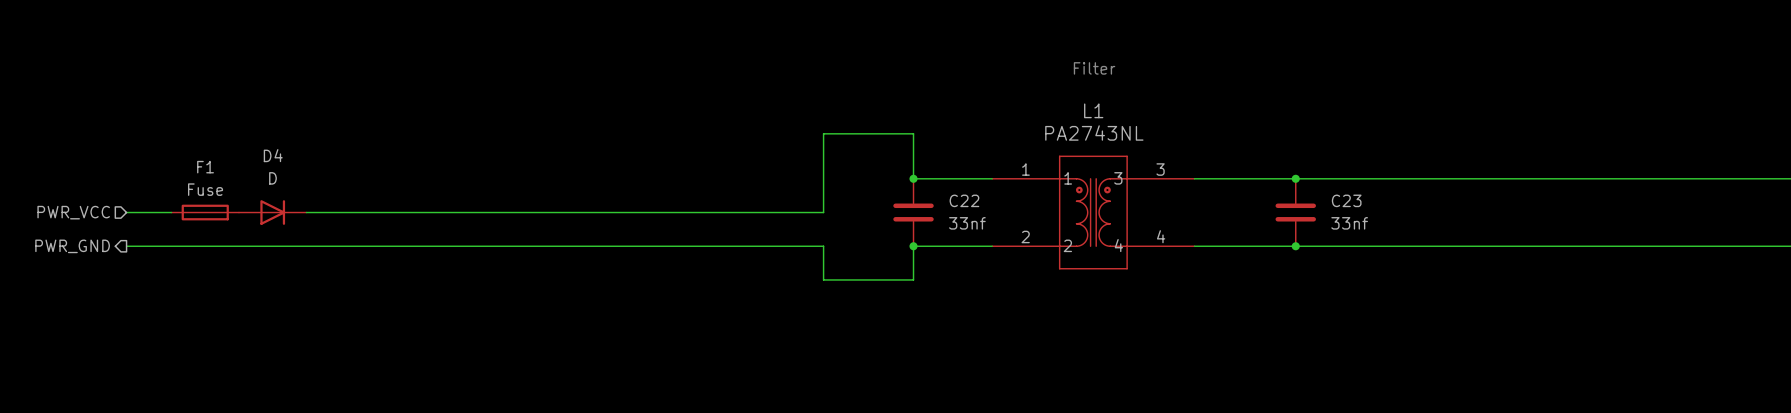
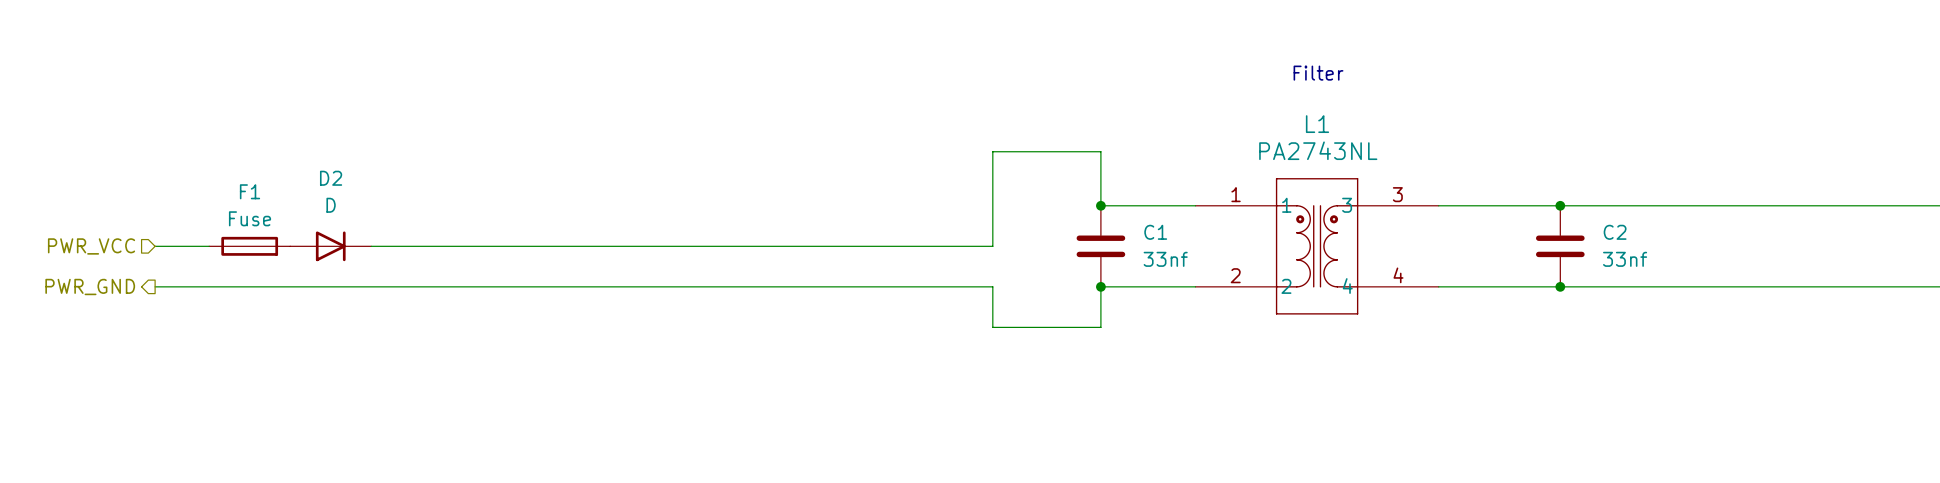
D4 name: D4 (273, 155) -> D2 (331, 178)
C22 name: C22 (964, 200) -> C1 (1155, 232)
C23 name: C23 (1346, 200) -> C2 (1615, 232)

